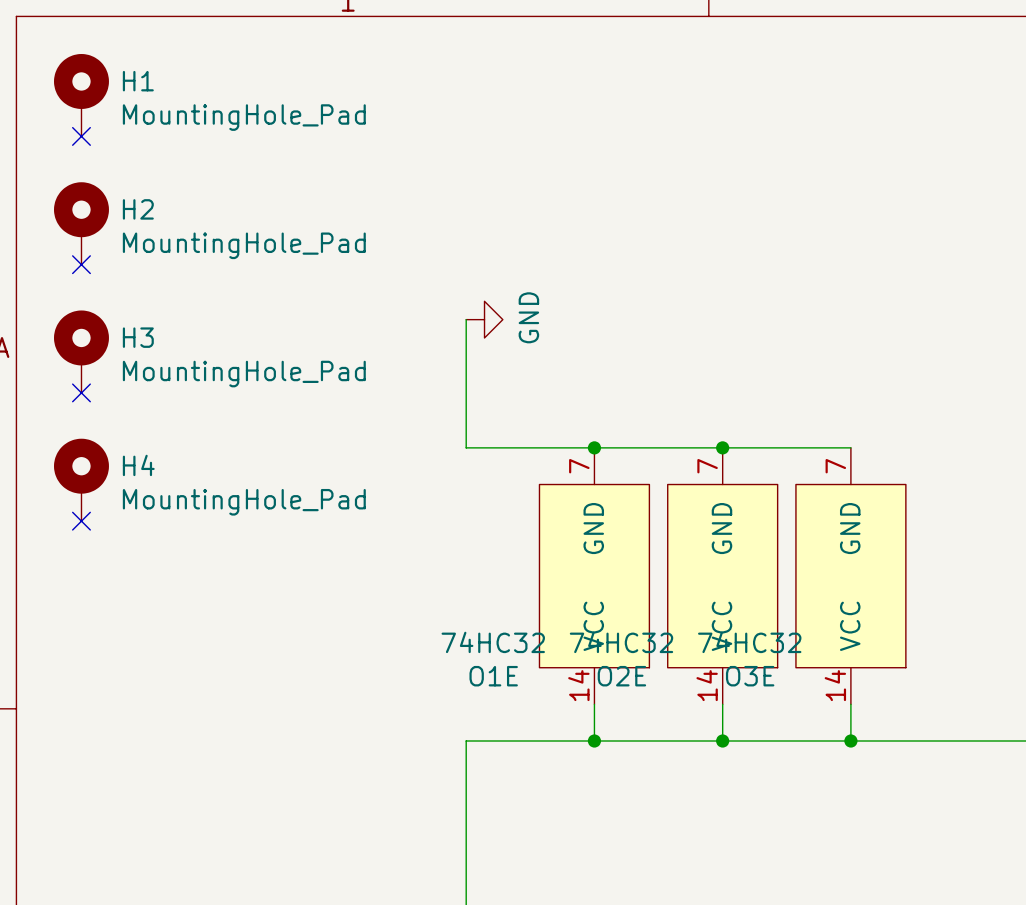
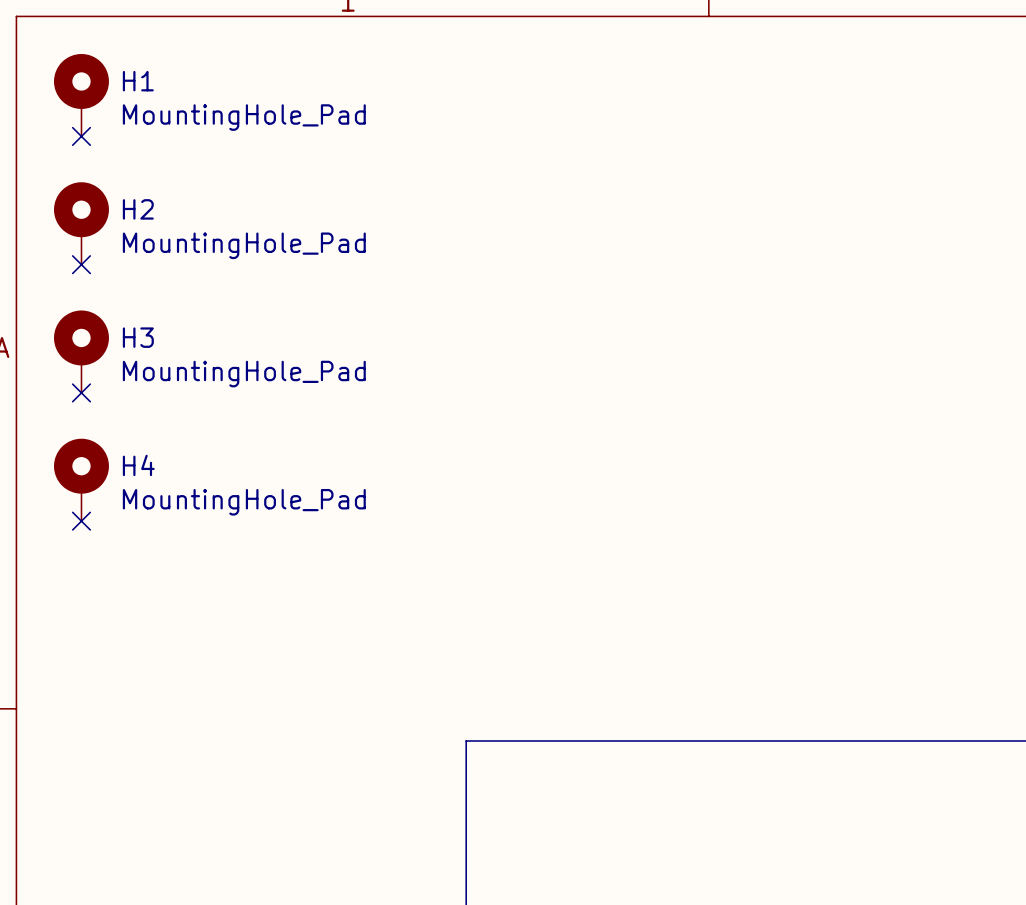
wire: (466, 319) (466, 447) (850, 447) -> none
power symbol: GND (484, 319) -> none
junction: (594, 447) -> none
junction: (722, 447) -> none
O1E: 74HC32 (594, 576) -> none
O2E: 74HC32 (722, 576) -> none
O3E: 74HC32 (850, 576) -> none
wire: (594, 704) (594, 741) -> none
wire: (722, 704) (722, 741) -> none
wire: (850, 704) (850, 741) -> none
junction: (594, 741) -> none
junction: (722, 741) -> none
junction: (850, 741) -> none

